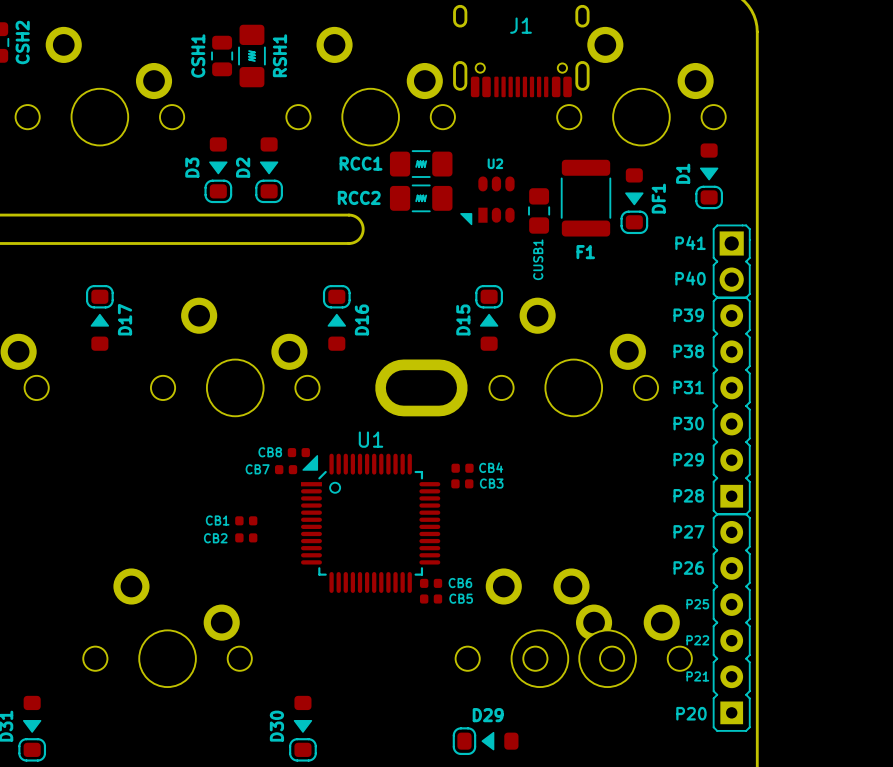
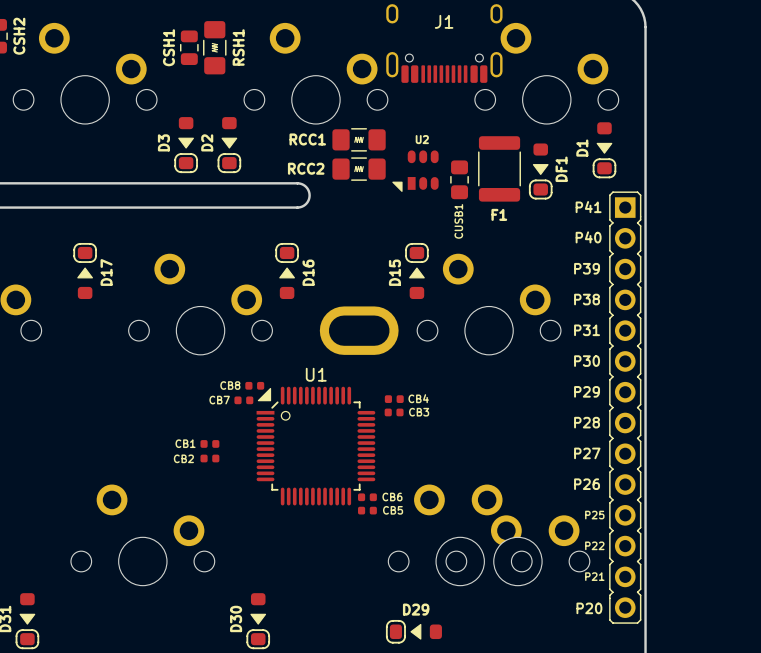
part: (731, 261) -> none
part: (731, 405) -> none
part: none -> (625, 407)
part: (731, 622) -> none

